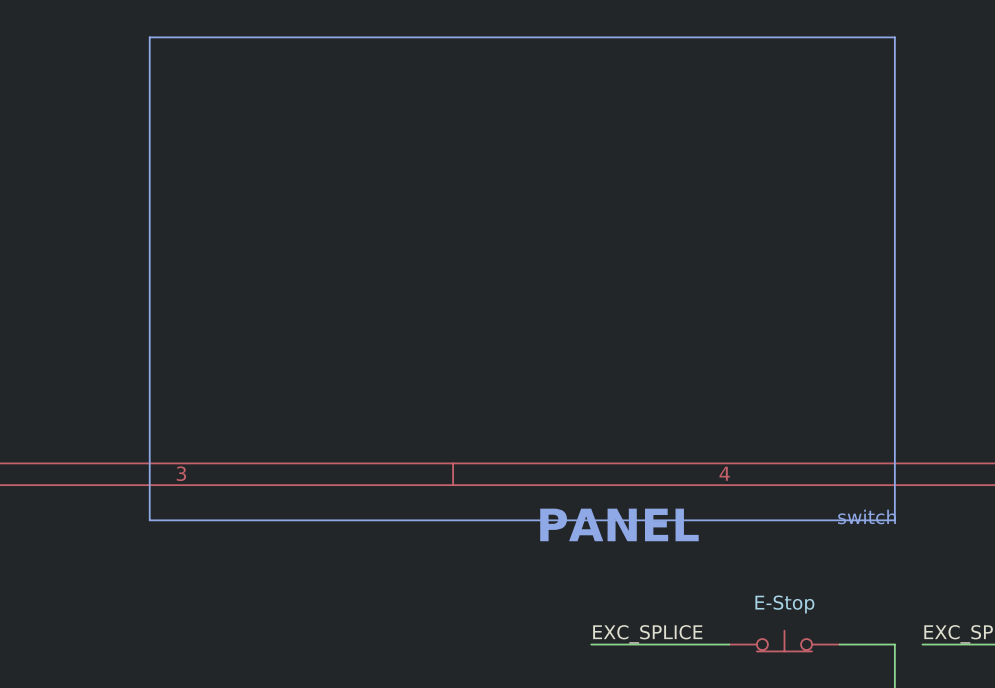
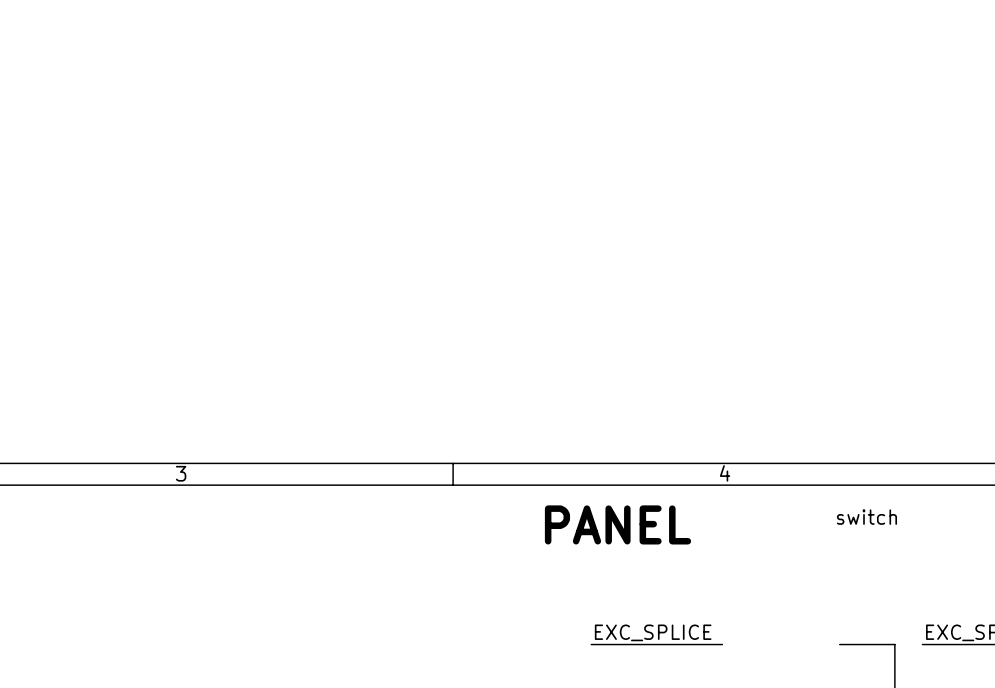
line: (149, 37) (894, 37) (894, 520) (149, 520) (149, 37) -> none
part: E-Stop (784, 641) -> none
wire: (722, 644) (729, 644) -> none

